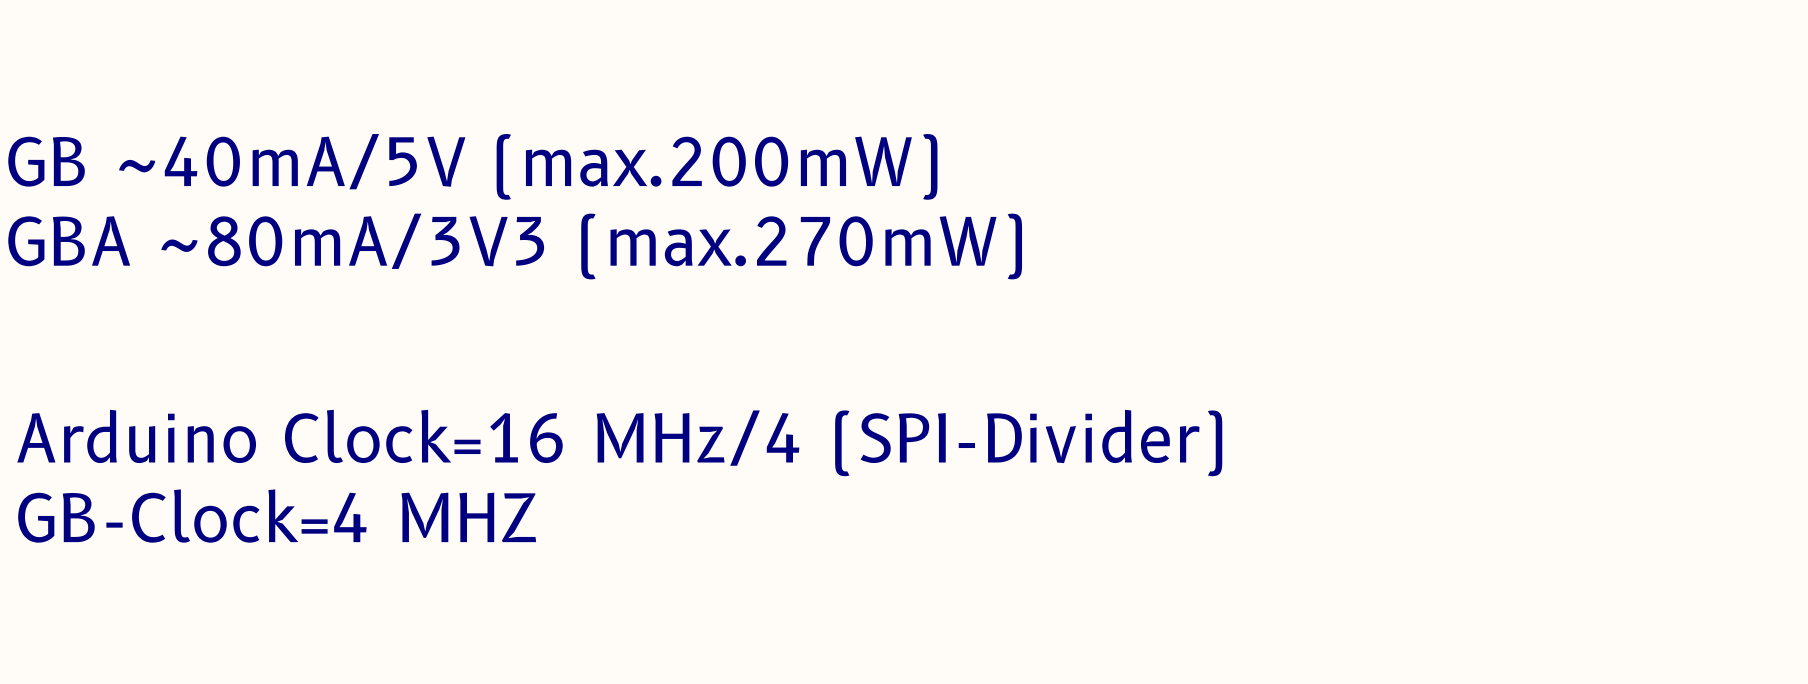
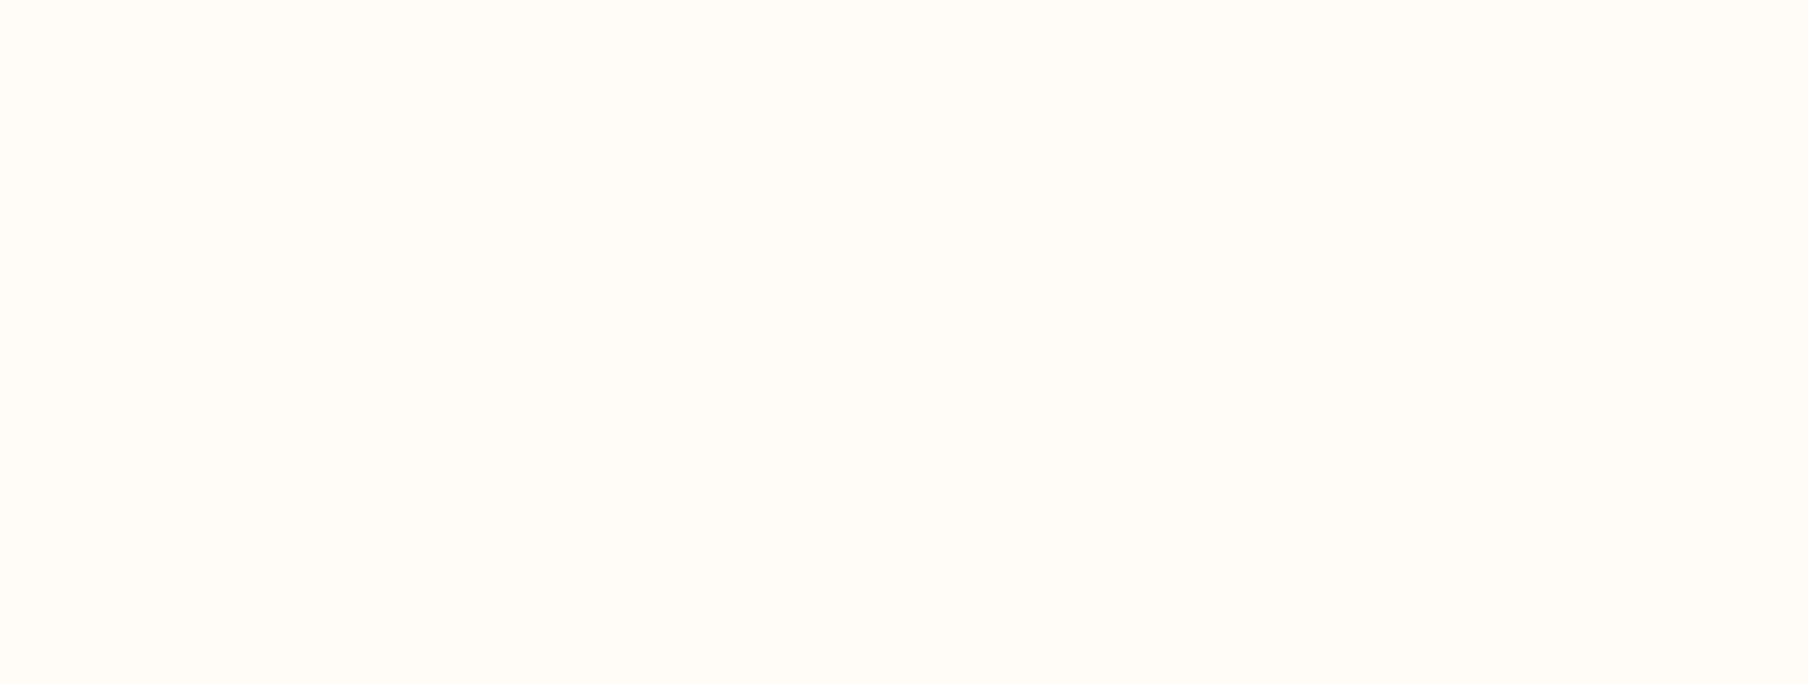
text: GB ~40mA/5V (max.200mW) (472, 166) -> none
text: GBA ~80mA/3V3 (max.270mW) (515, 246) -> none
text: Arduino Clock=16 MHz/4 (SPI-Divider) (619, 442) -> none
text: GB-Clock=4 MHZ (277, 516) -> none

